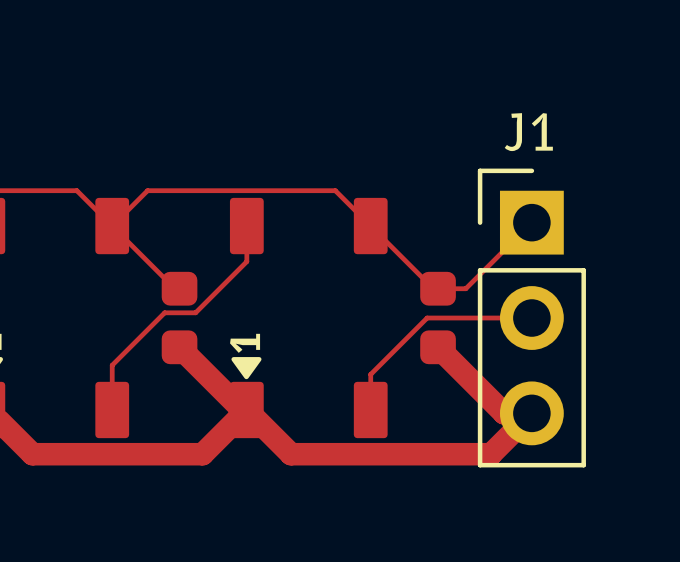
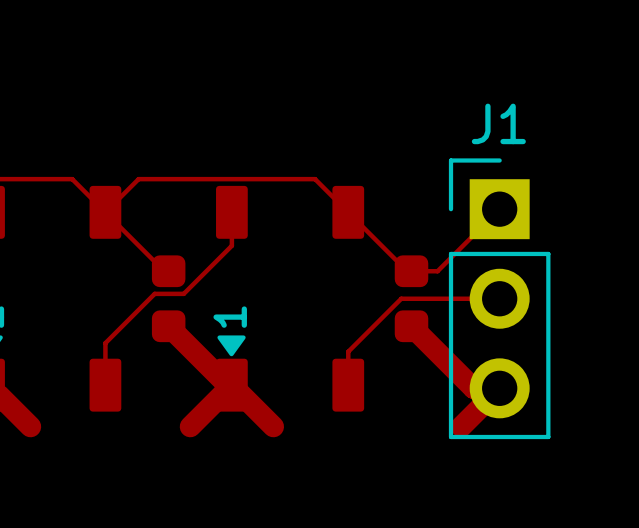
top track: (32, 454) (202, 454) -> none
top track: (291, 454) (491, 454) -> none

